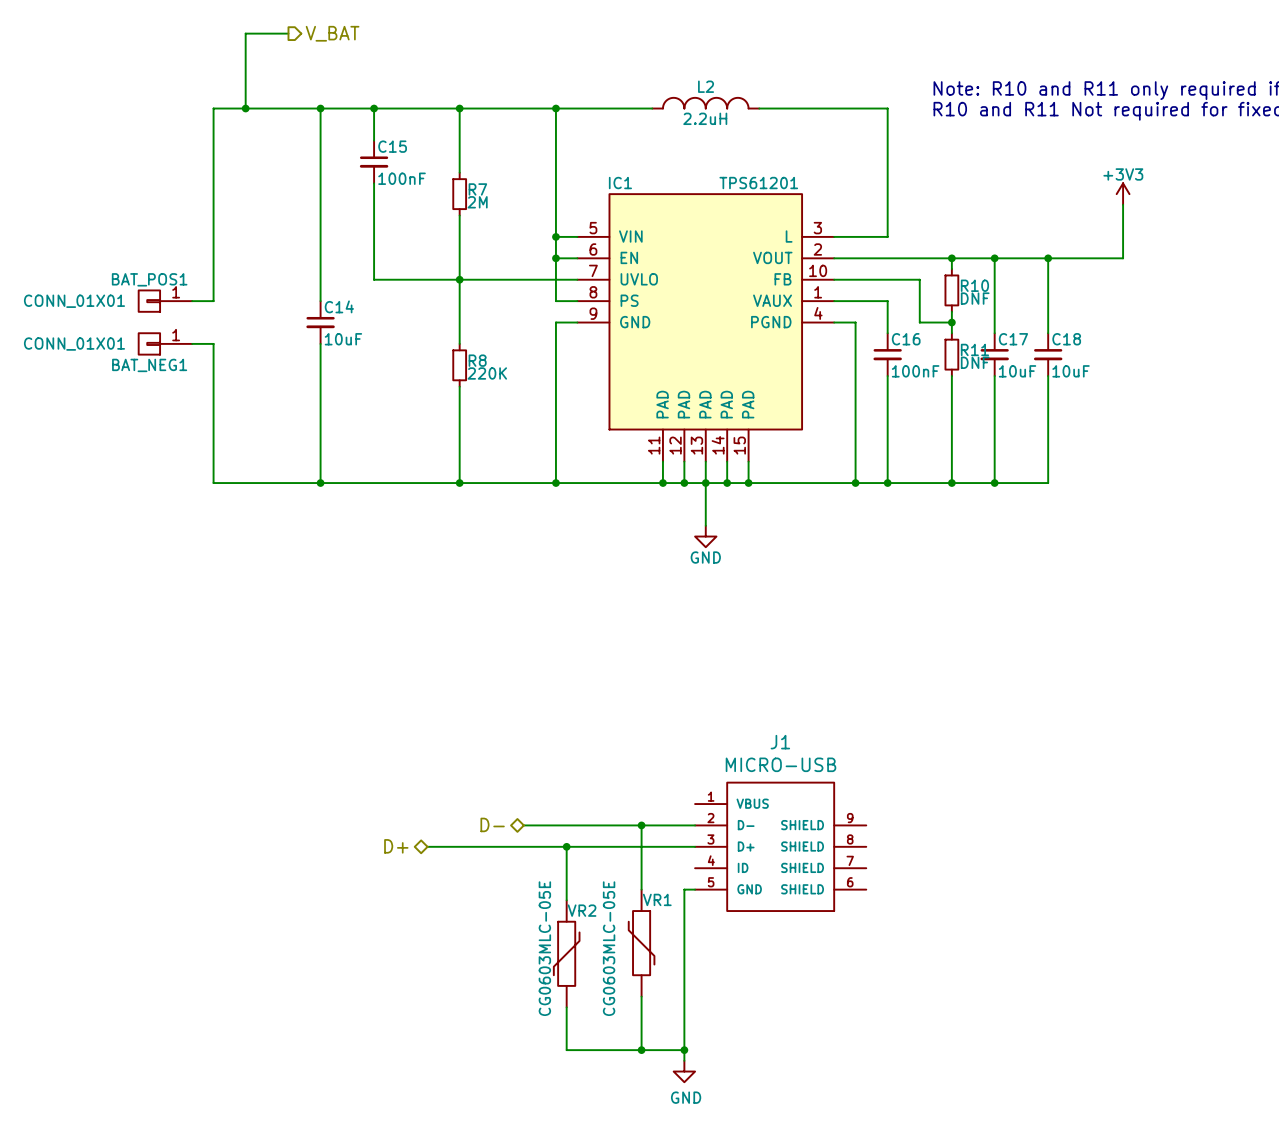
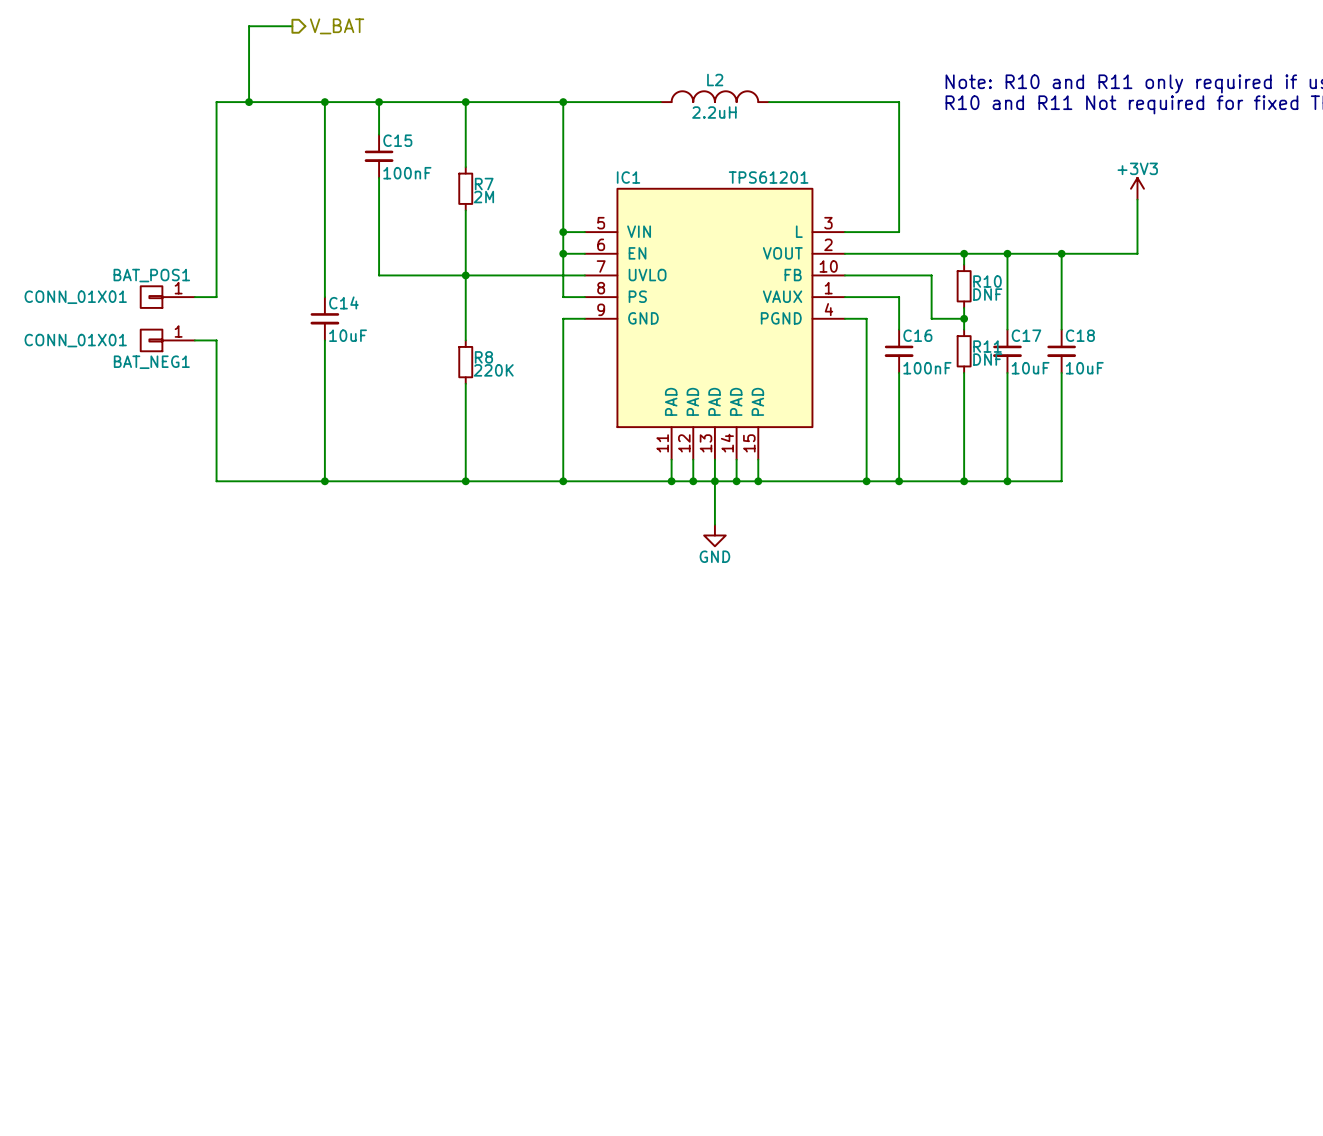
hierarchical label: D- (492, 824) -> none
wire: (523, 825) (695, 825) -> none
wire: (641, 825) (641, 889) -> none
junction: (641, 825) -> none
hierarchical label: D+ (396, 846) -> none
wire: (427, 846) (695, 846) -> none
wire: (566, 846) (566, 900) -> none
junction: (566, 846) -> none
J1: MICRO-USB (780, 846) -> none
wire: (695, 889) (684, 889) (684, 1060) -> none
VR1: CG0603MLC-05E (641, 943) -> none
VR2: CG0603MLC-05E (566, 953) -> none
wire: (641, 996) (641, 1050) -> none
wire: (566, 1007) (566, 1050) (684, 1050) -> none
junction: (641, 1050) -> none
junction: (684, 1050) -> none
power symbol: GND (684, 1071) -> none

